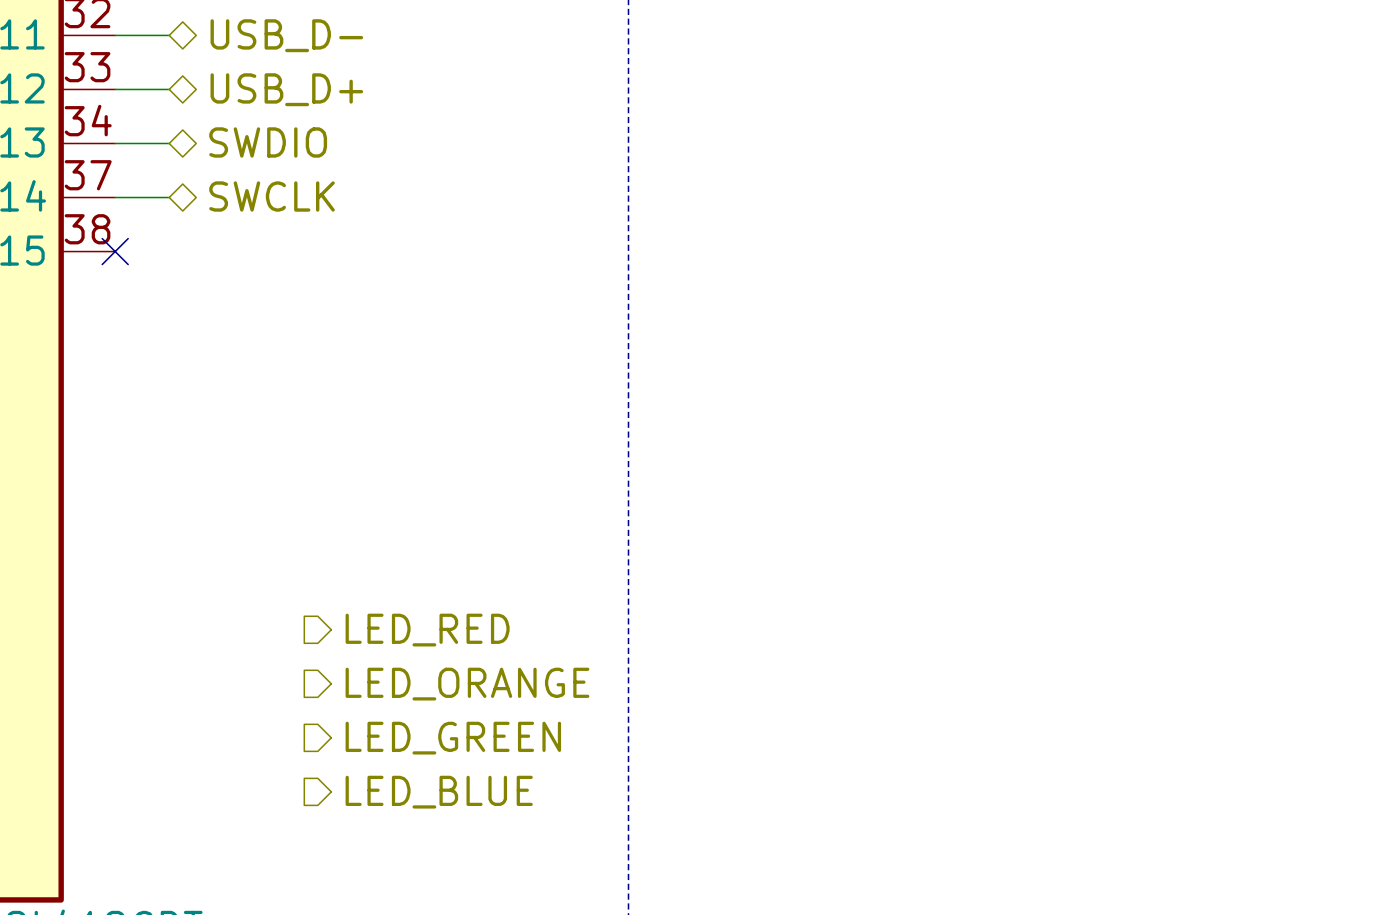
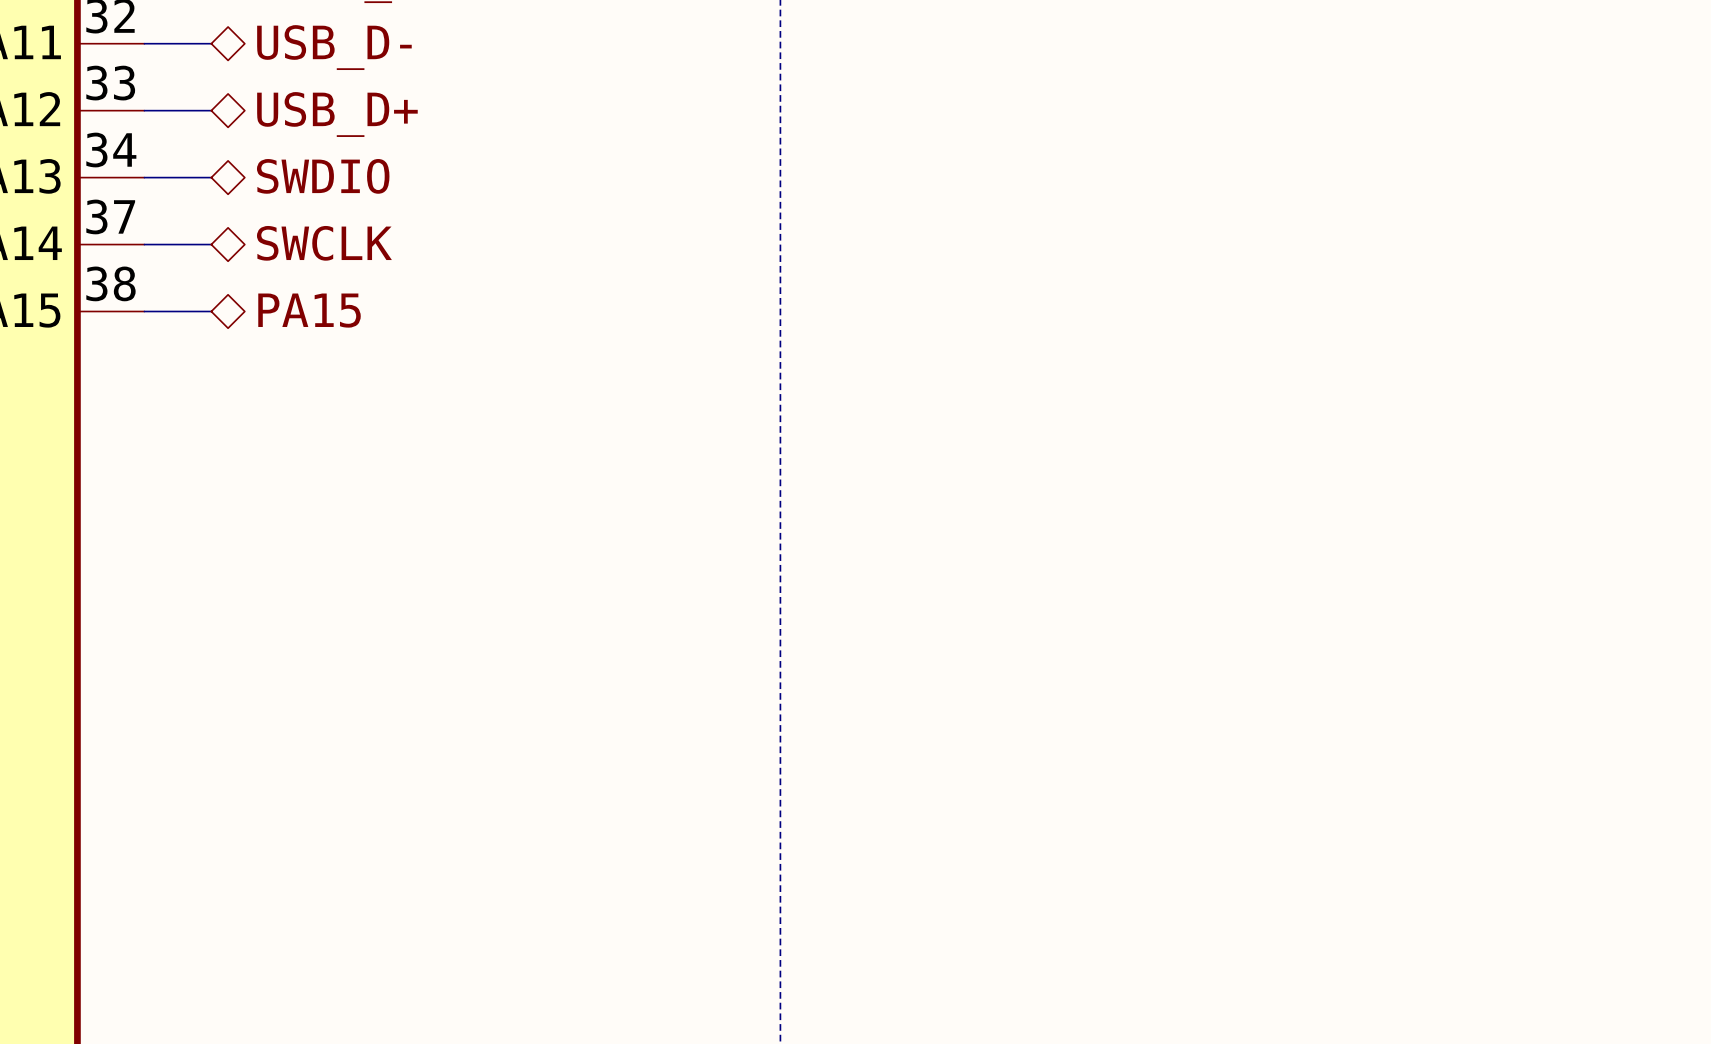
hierarchical label: none -> PA15 (309, 310)
wire: none -> (144, 311) (211, 311)
no-connect mark: (115, 251) -> none
hierarchical label: LED_RED (427, 630) -> none
hierarchical label: LED_ORANGE (467, 684) -> none
hierarchical label: LED_GREEN (453, 738) -> none
hierarchical label: LED_BLUE (439, 792) -> none

